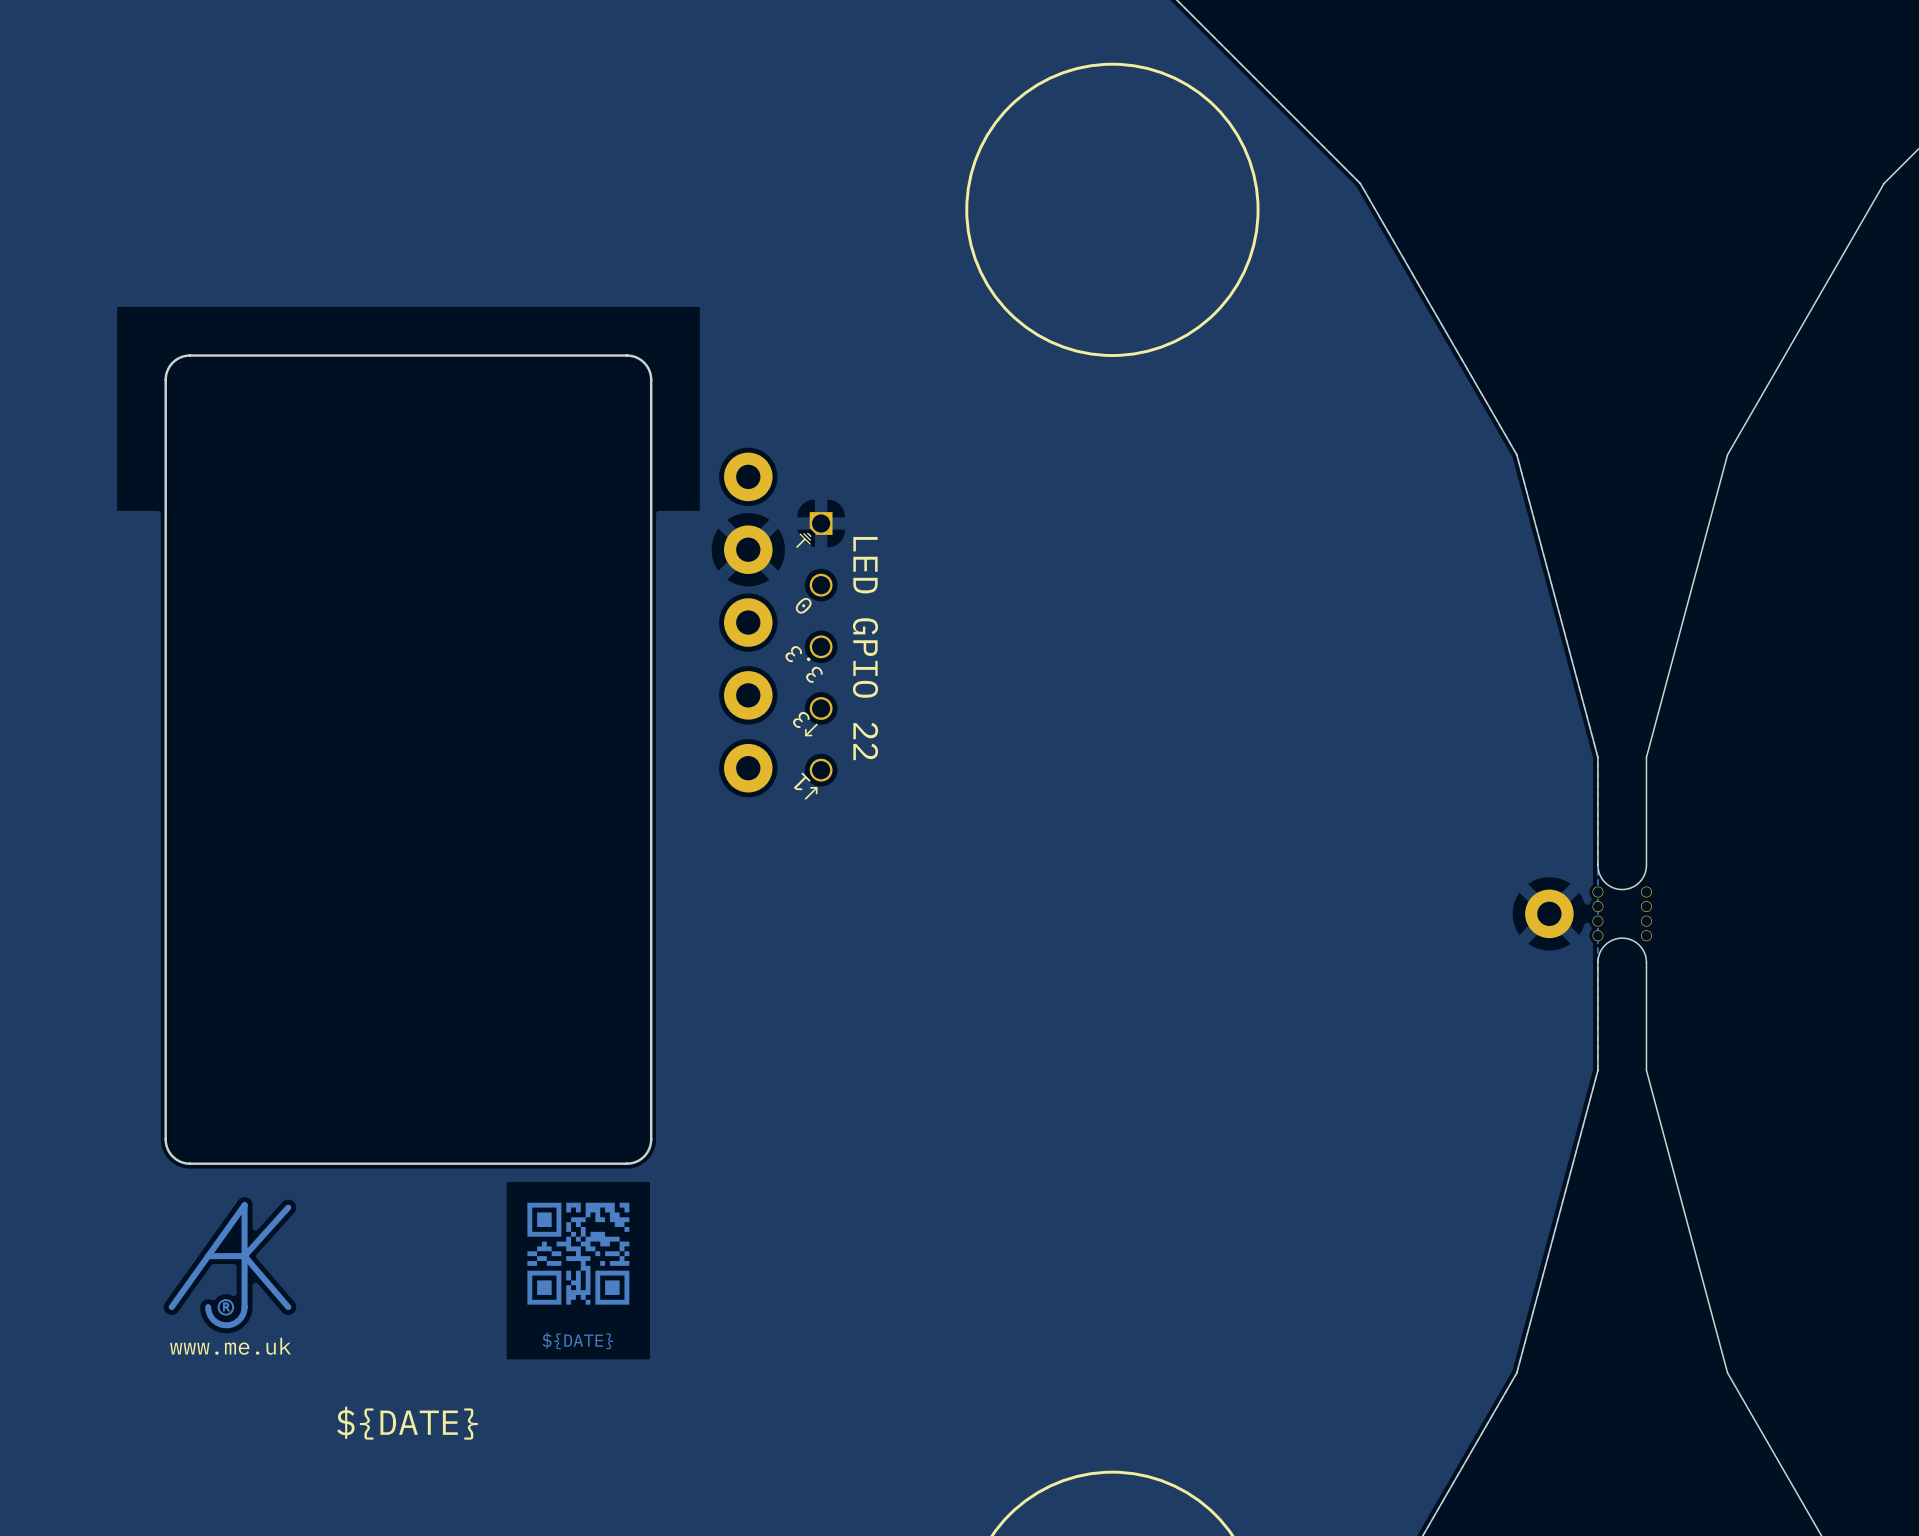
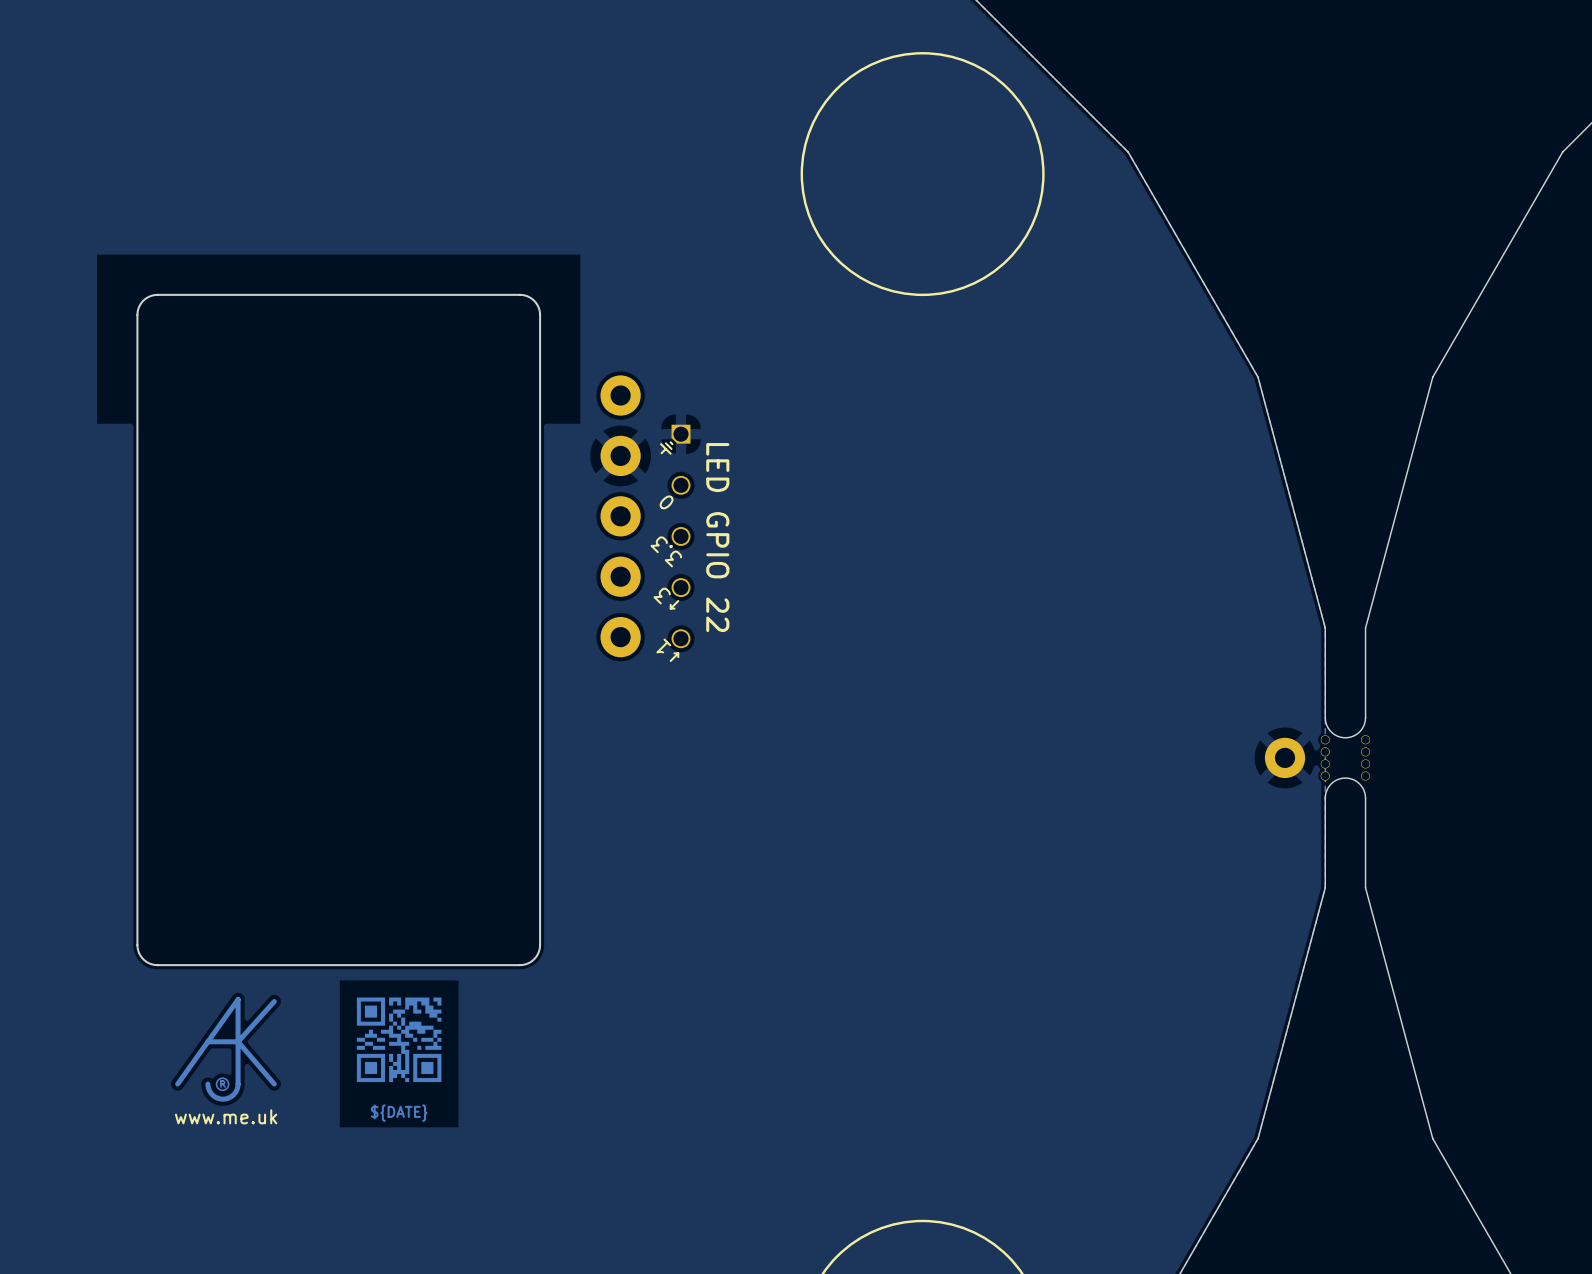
part position: (578, 1253) -> (399, 1039)
drawing position: (230, 1265) -> (226, 1049)
text: ${DATE} (407, 1423) -> none

